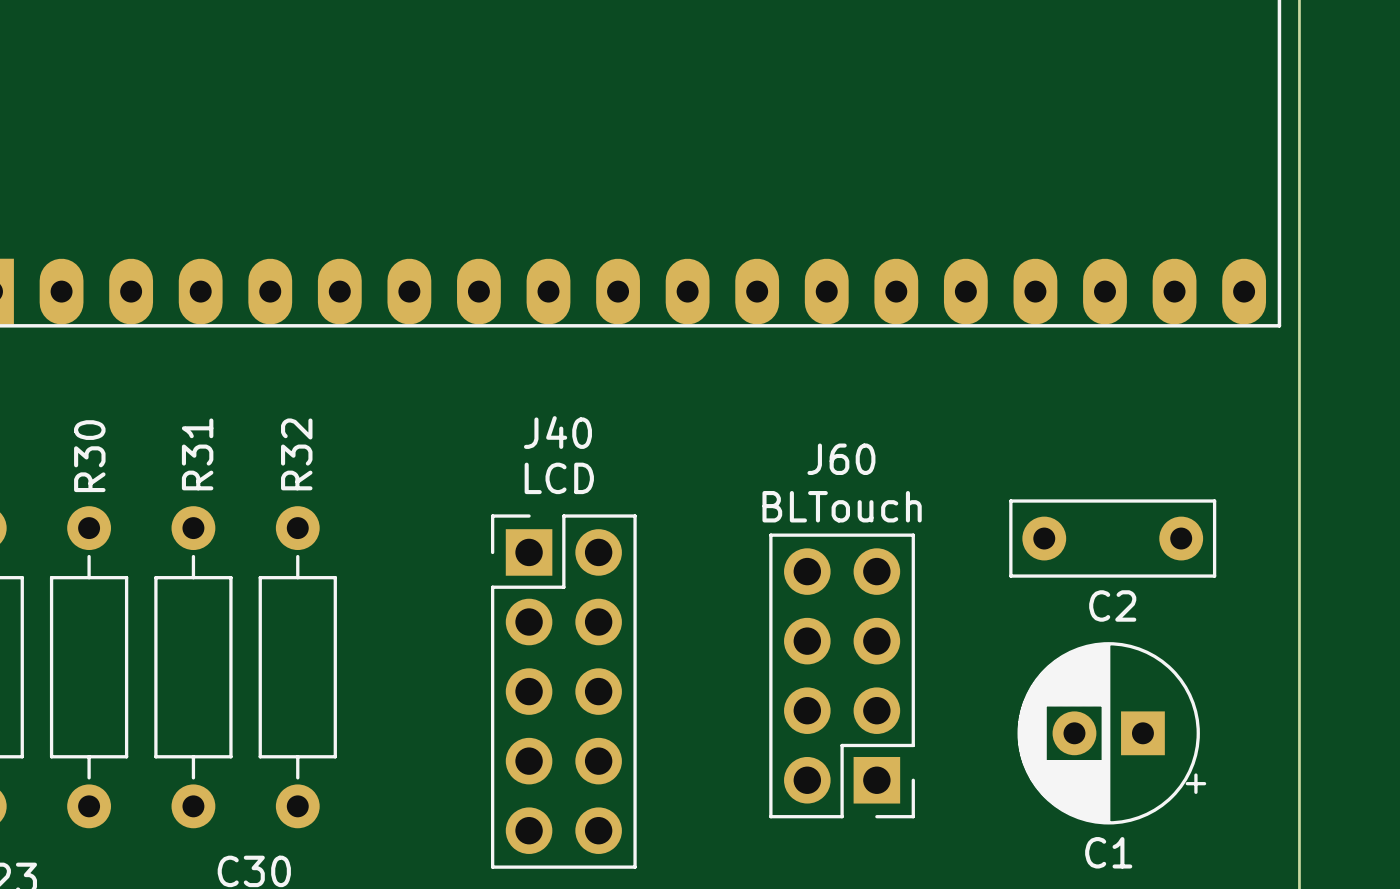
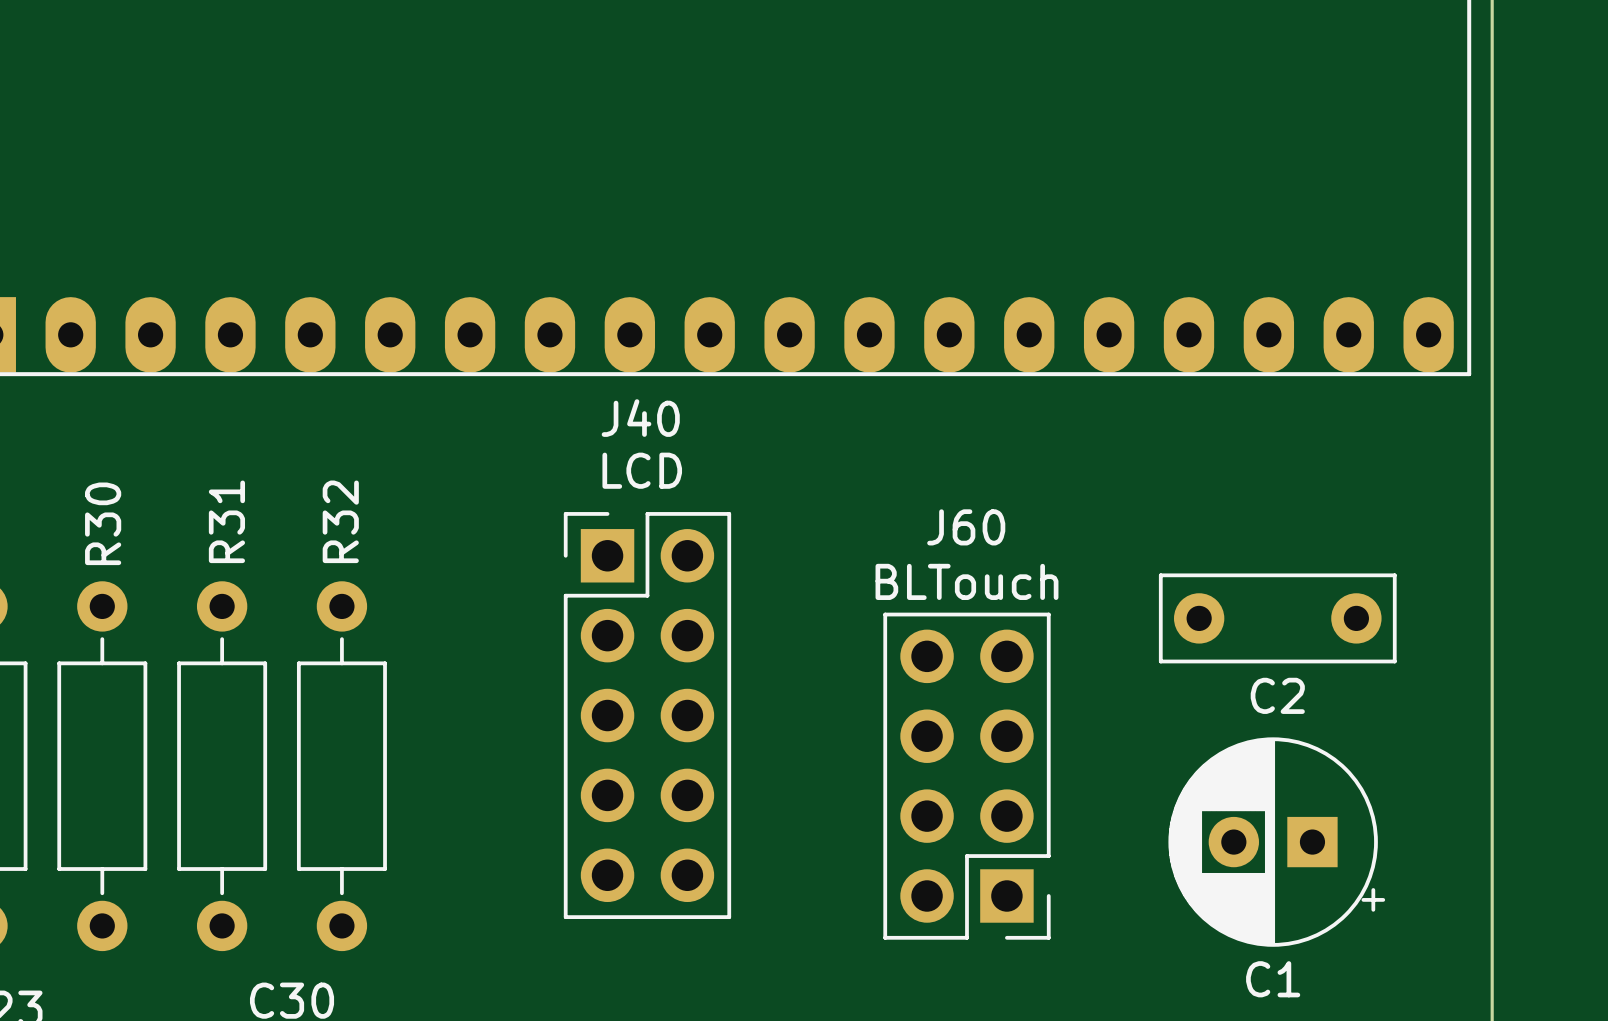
J40 position: (563, 691) -> (647, 715)

